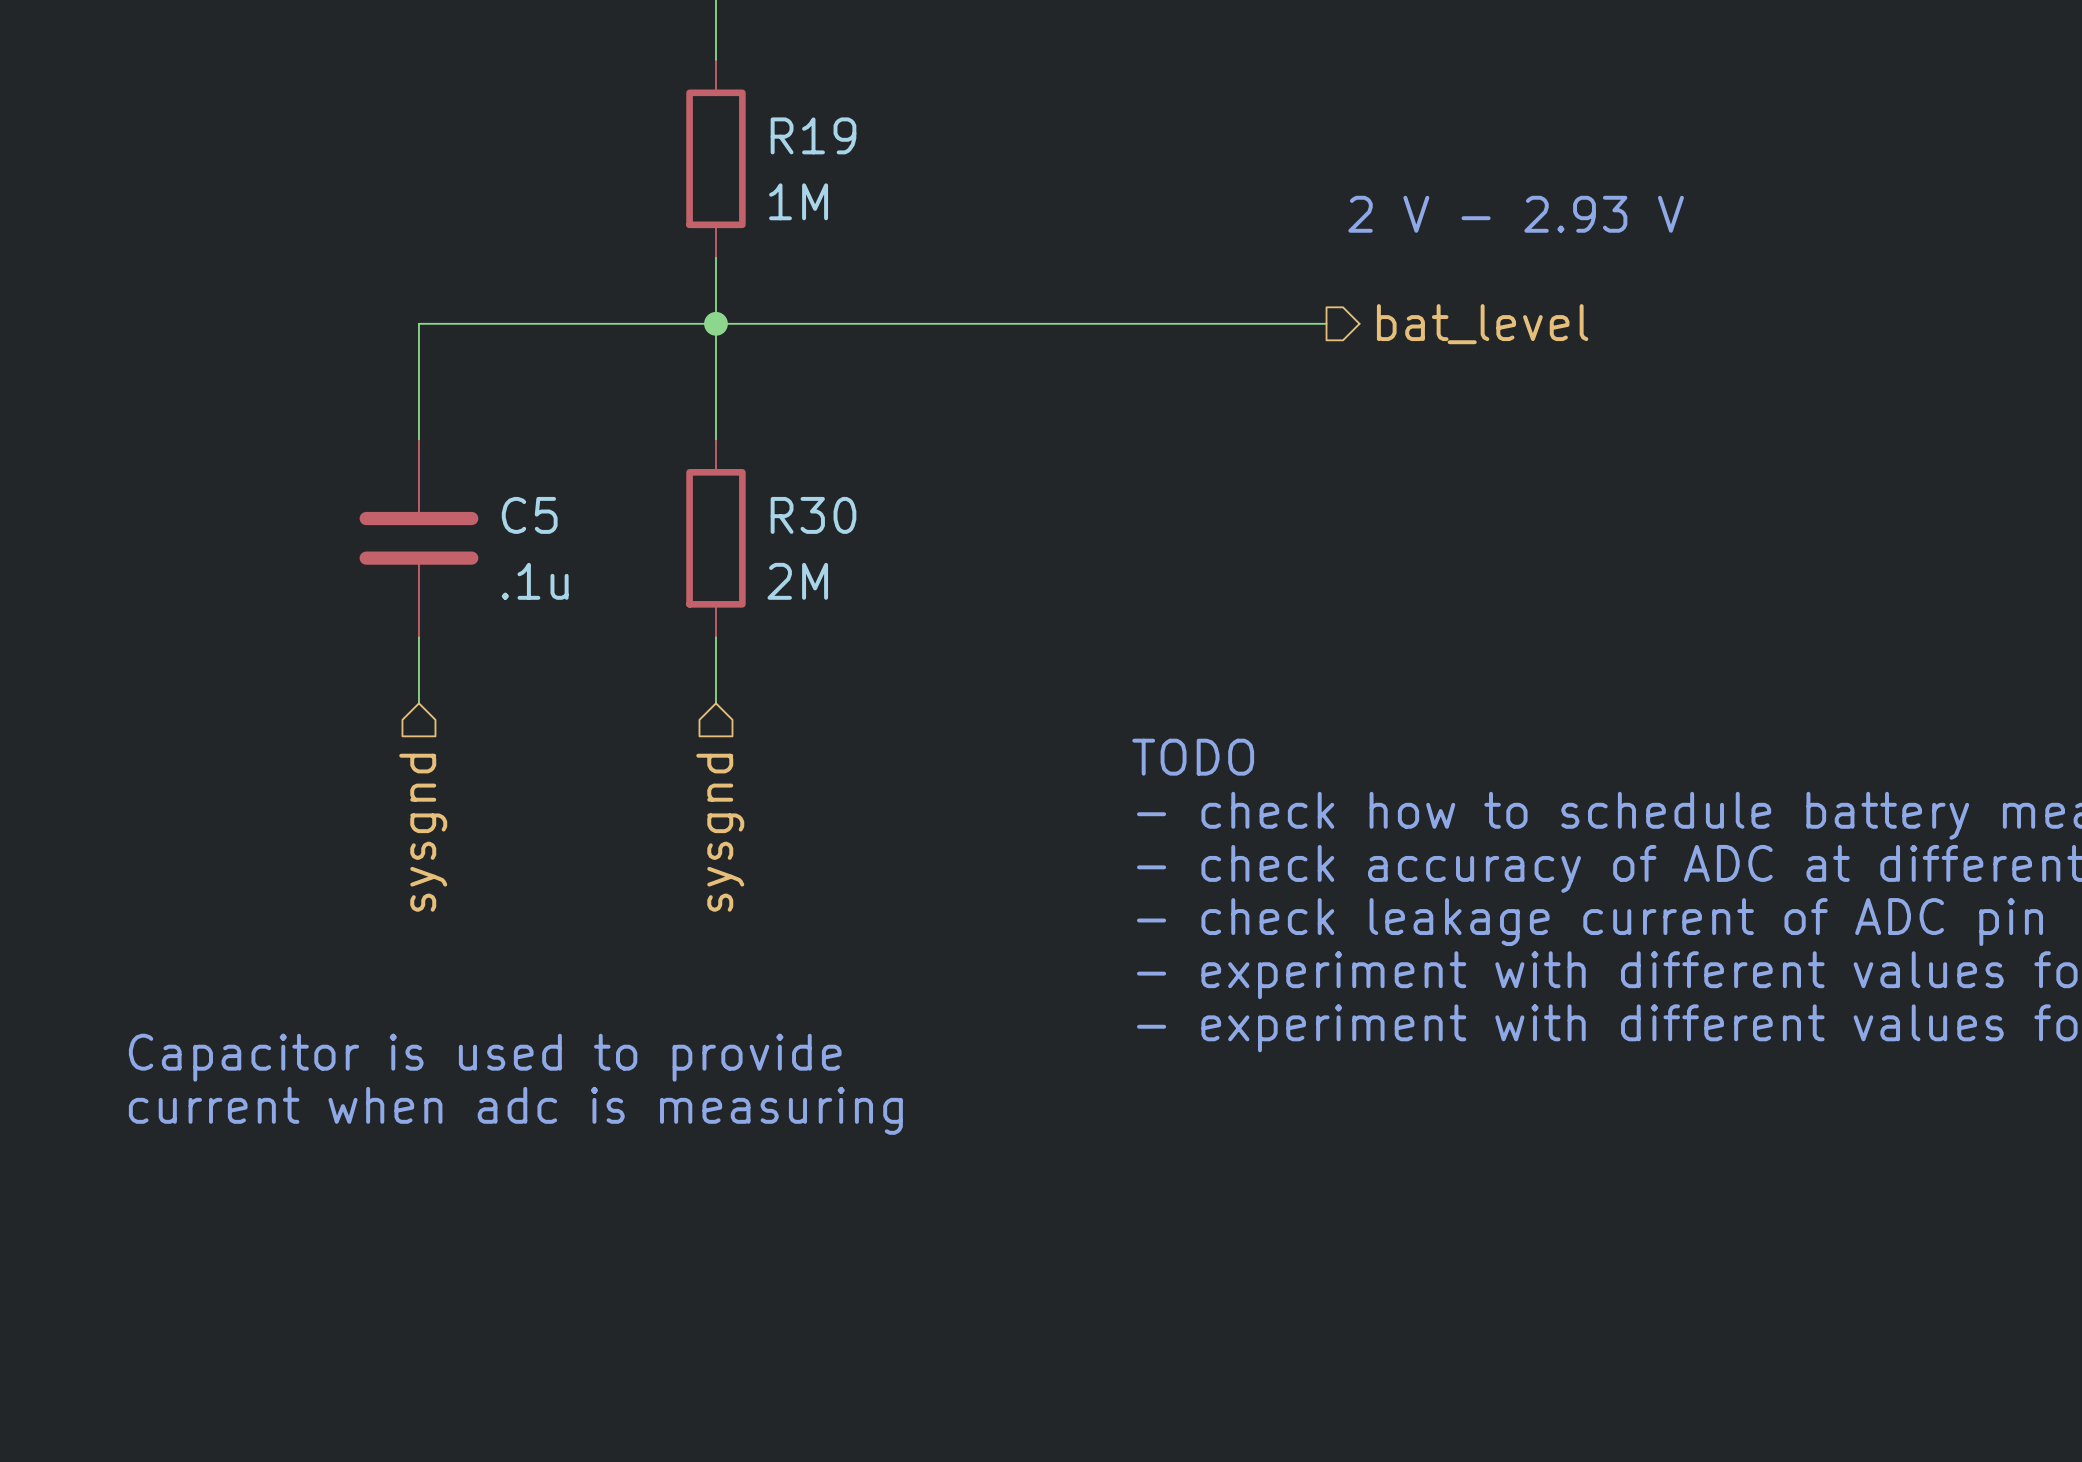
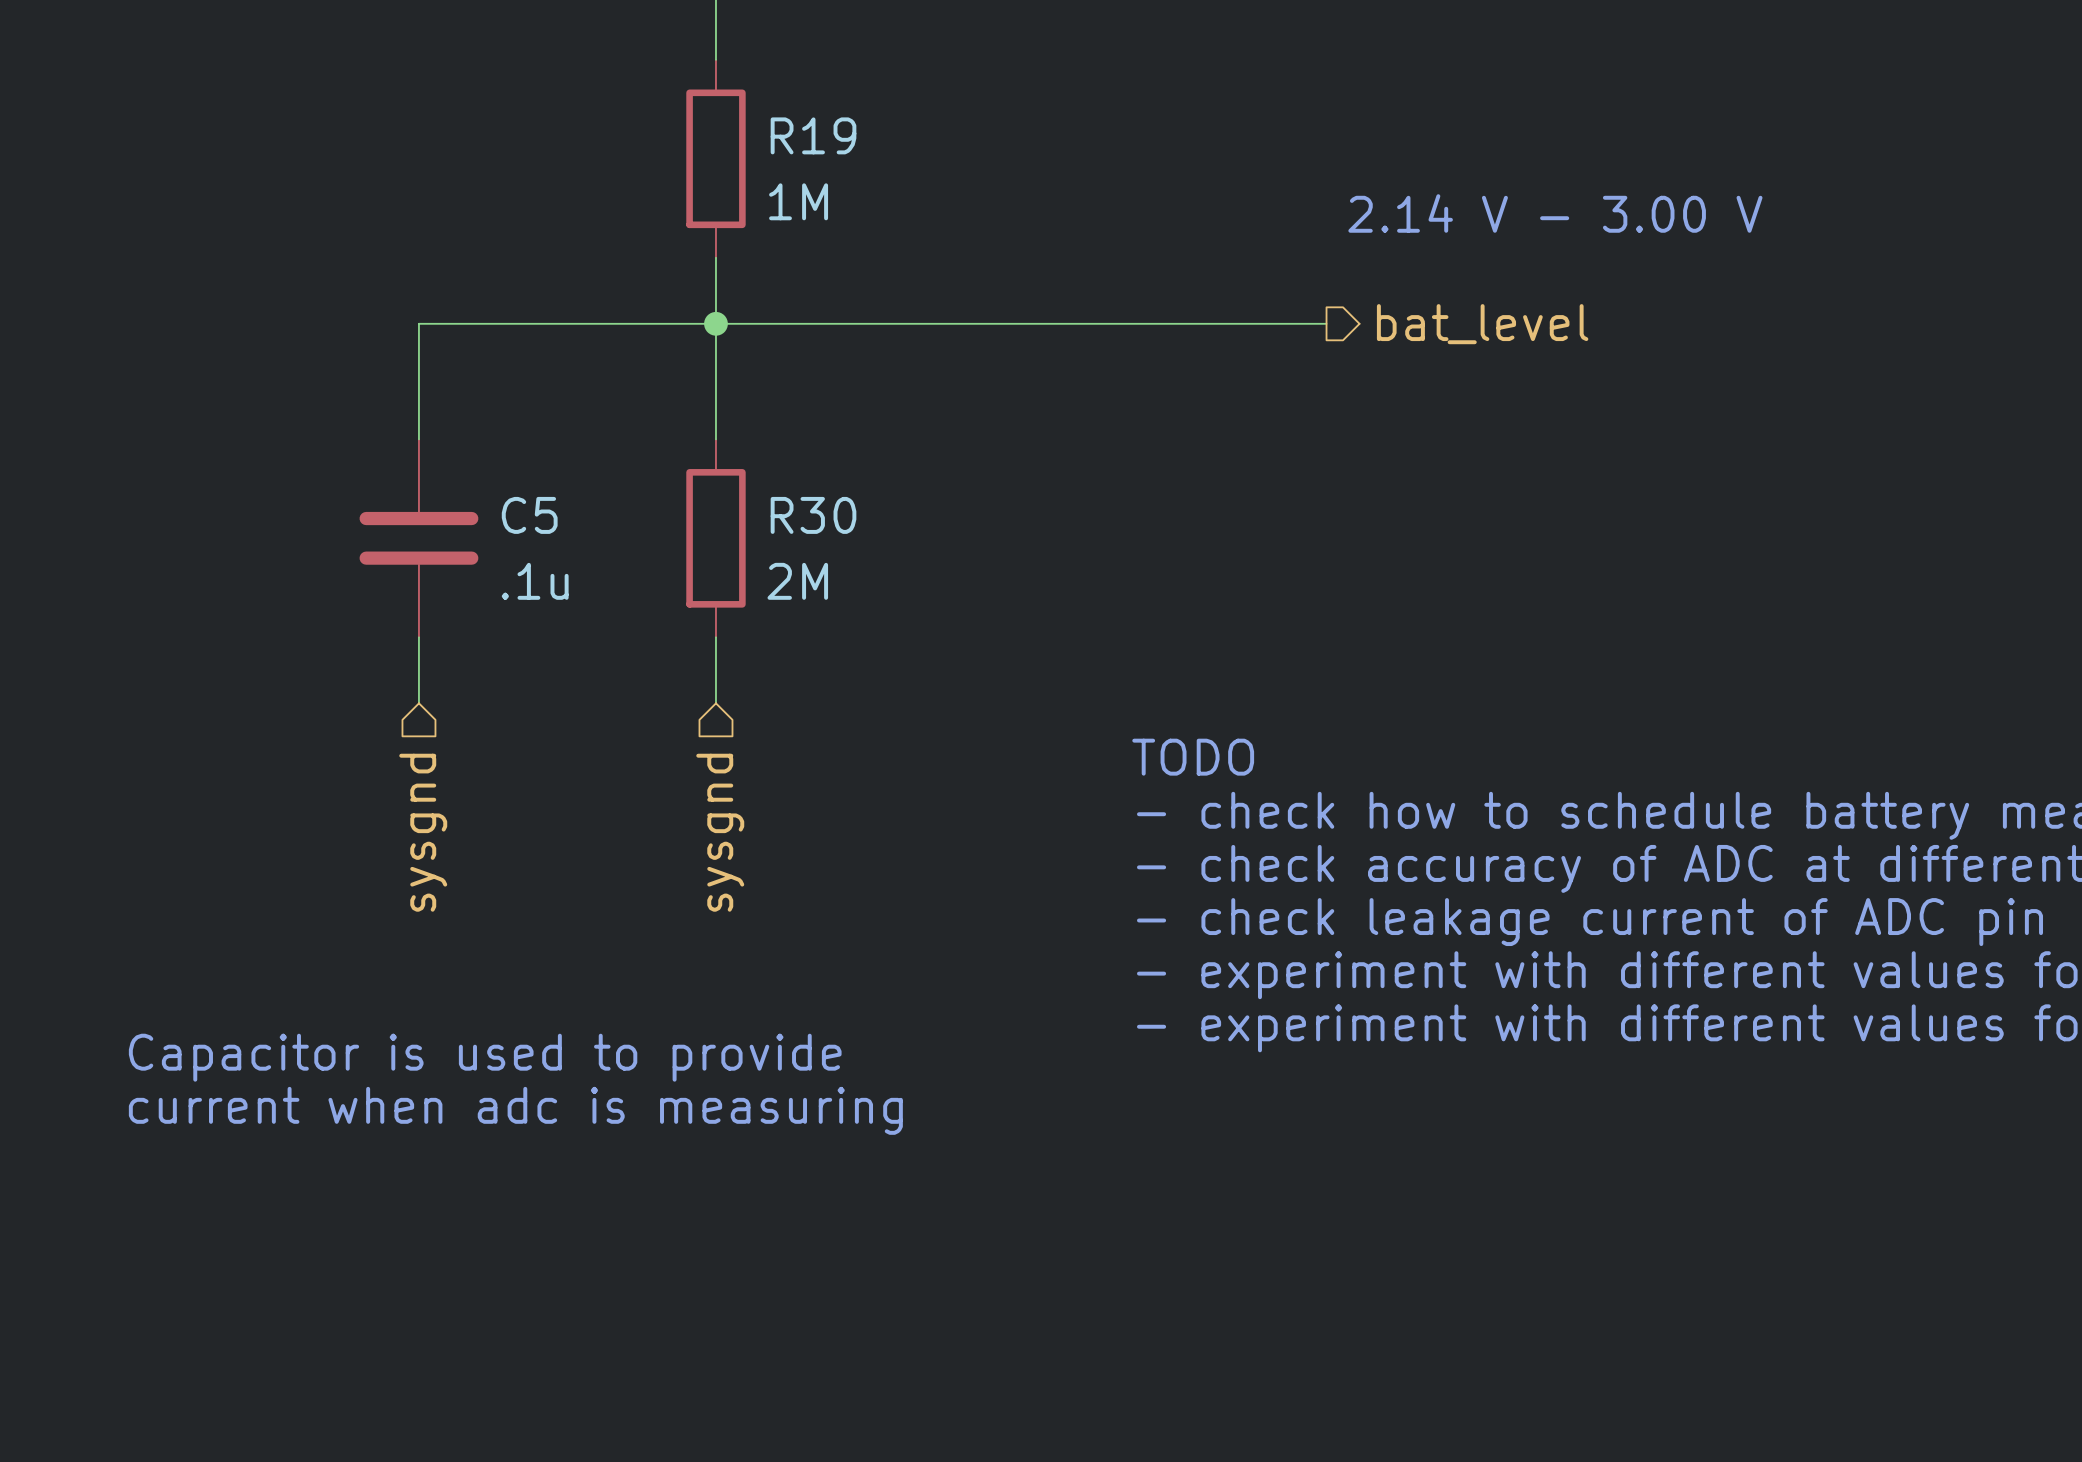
text: 2 V - 2.93 V (1516, 214) -> 2.14 V - 3.00 V (1555, 213)

